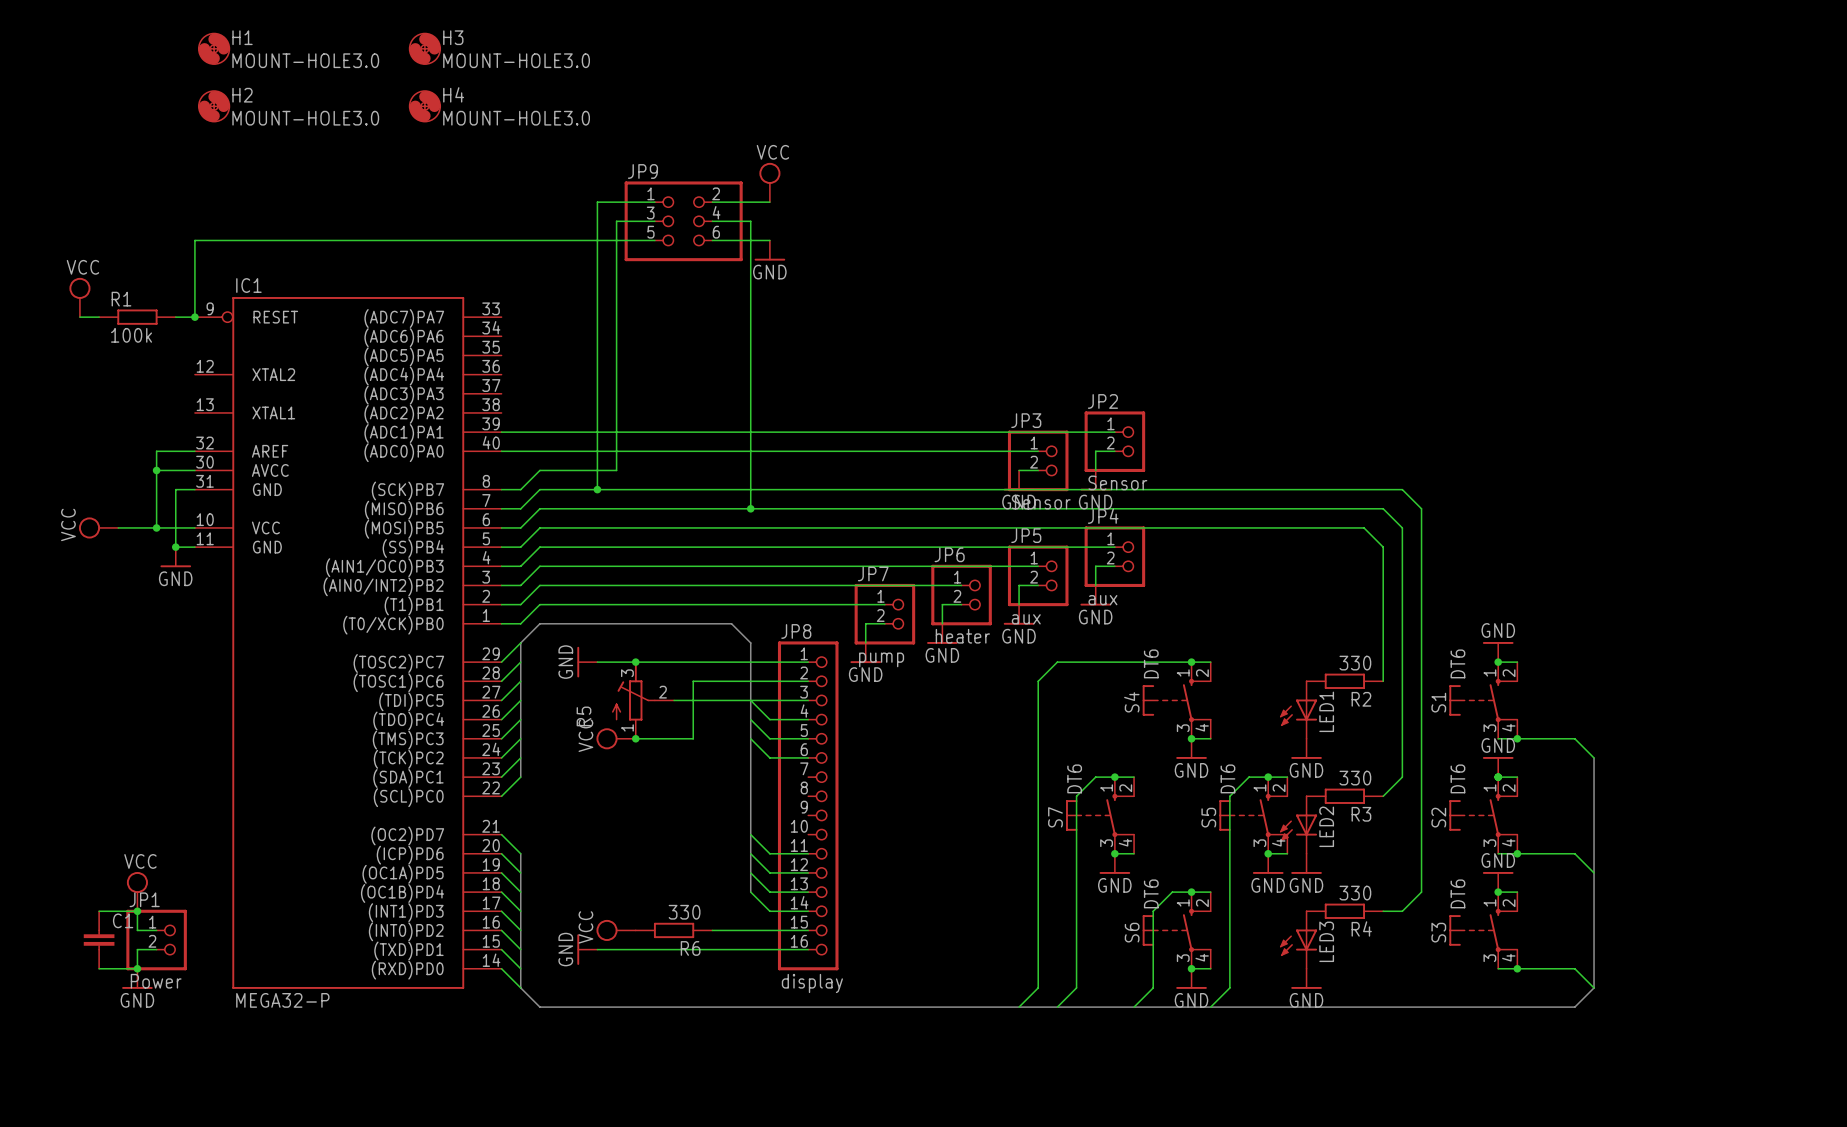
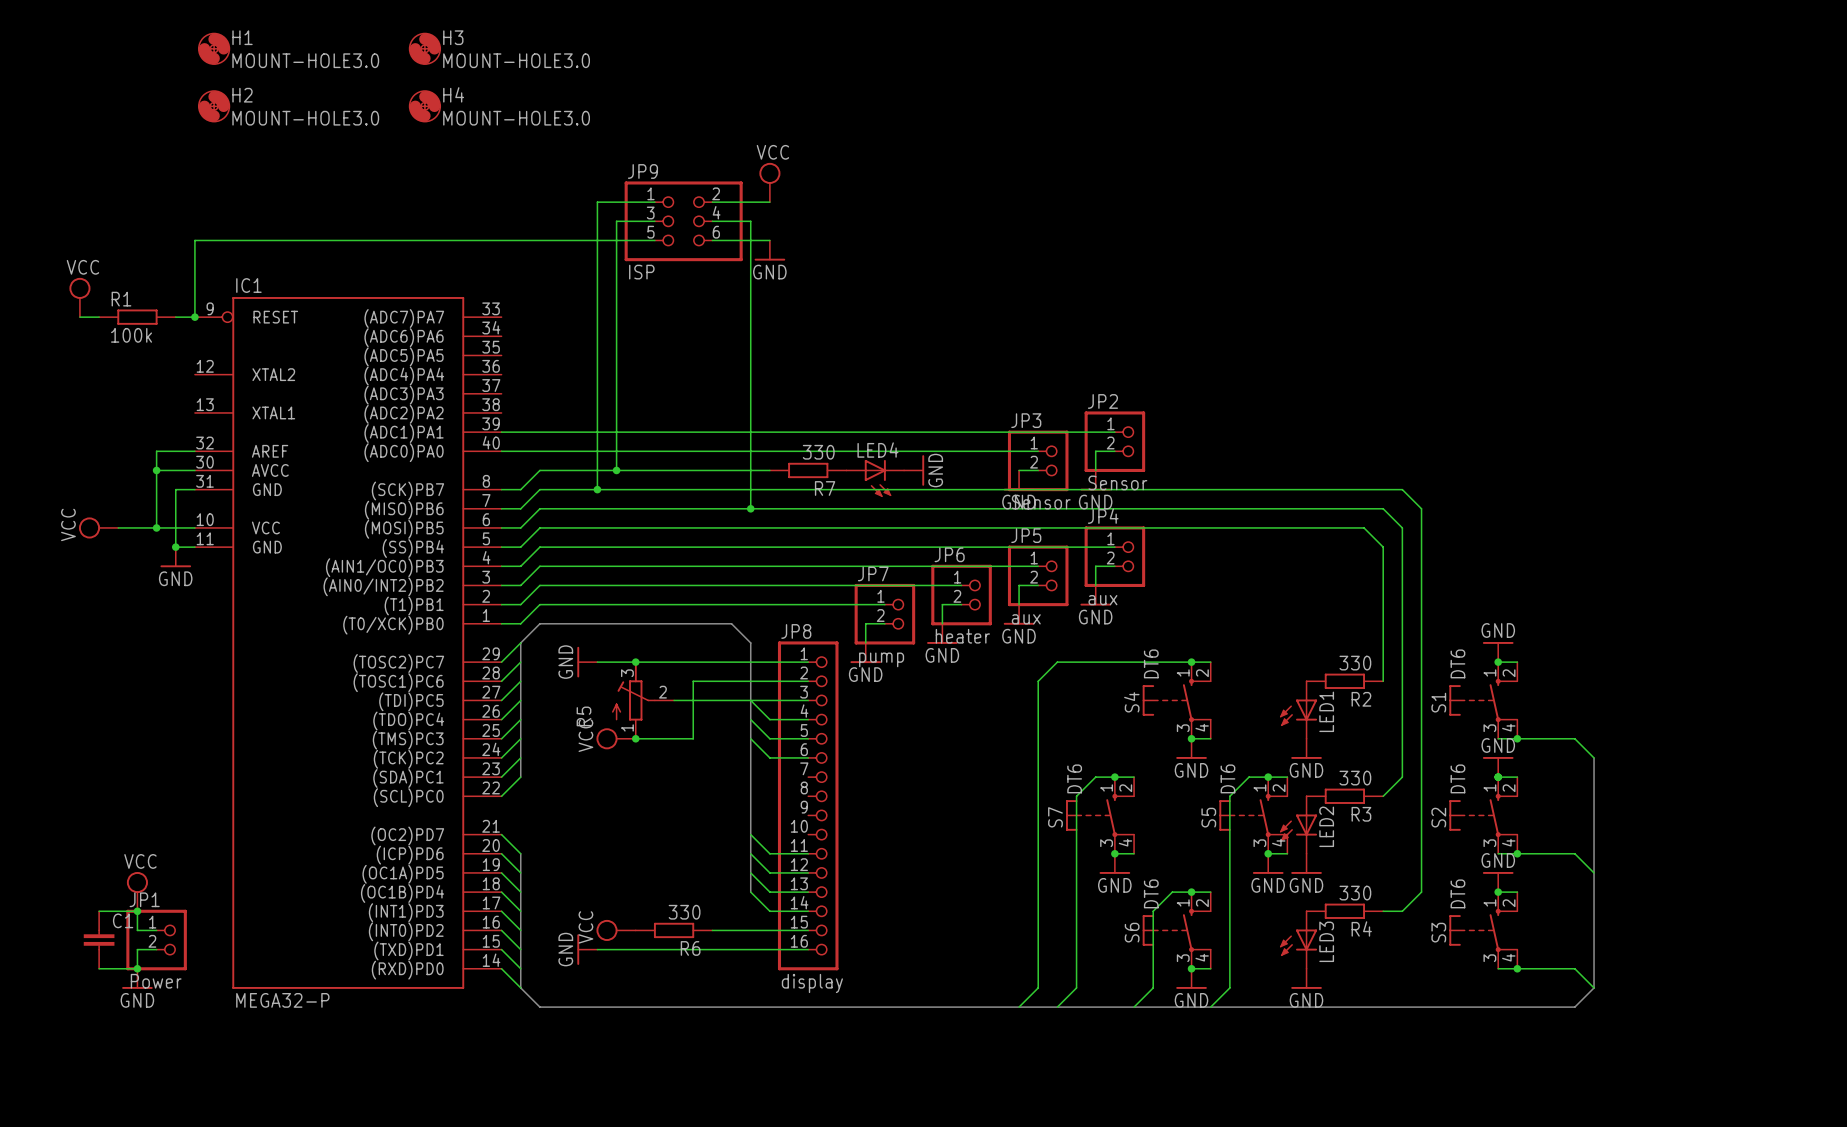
JP9 value: none -> ISP (641, 272)
wire: none -> (616, 470) (769, 470)
junction: none -> (616, 470)
R7: none -> 330 (808, 470)
power symbol: none -> GND (914, 470)
LED4: none -> (875, 478)

